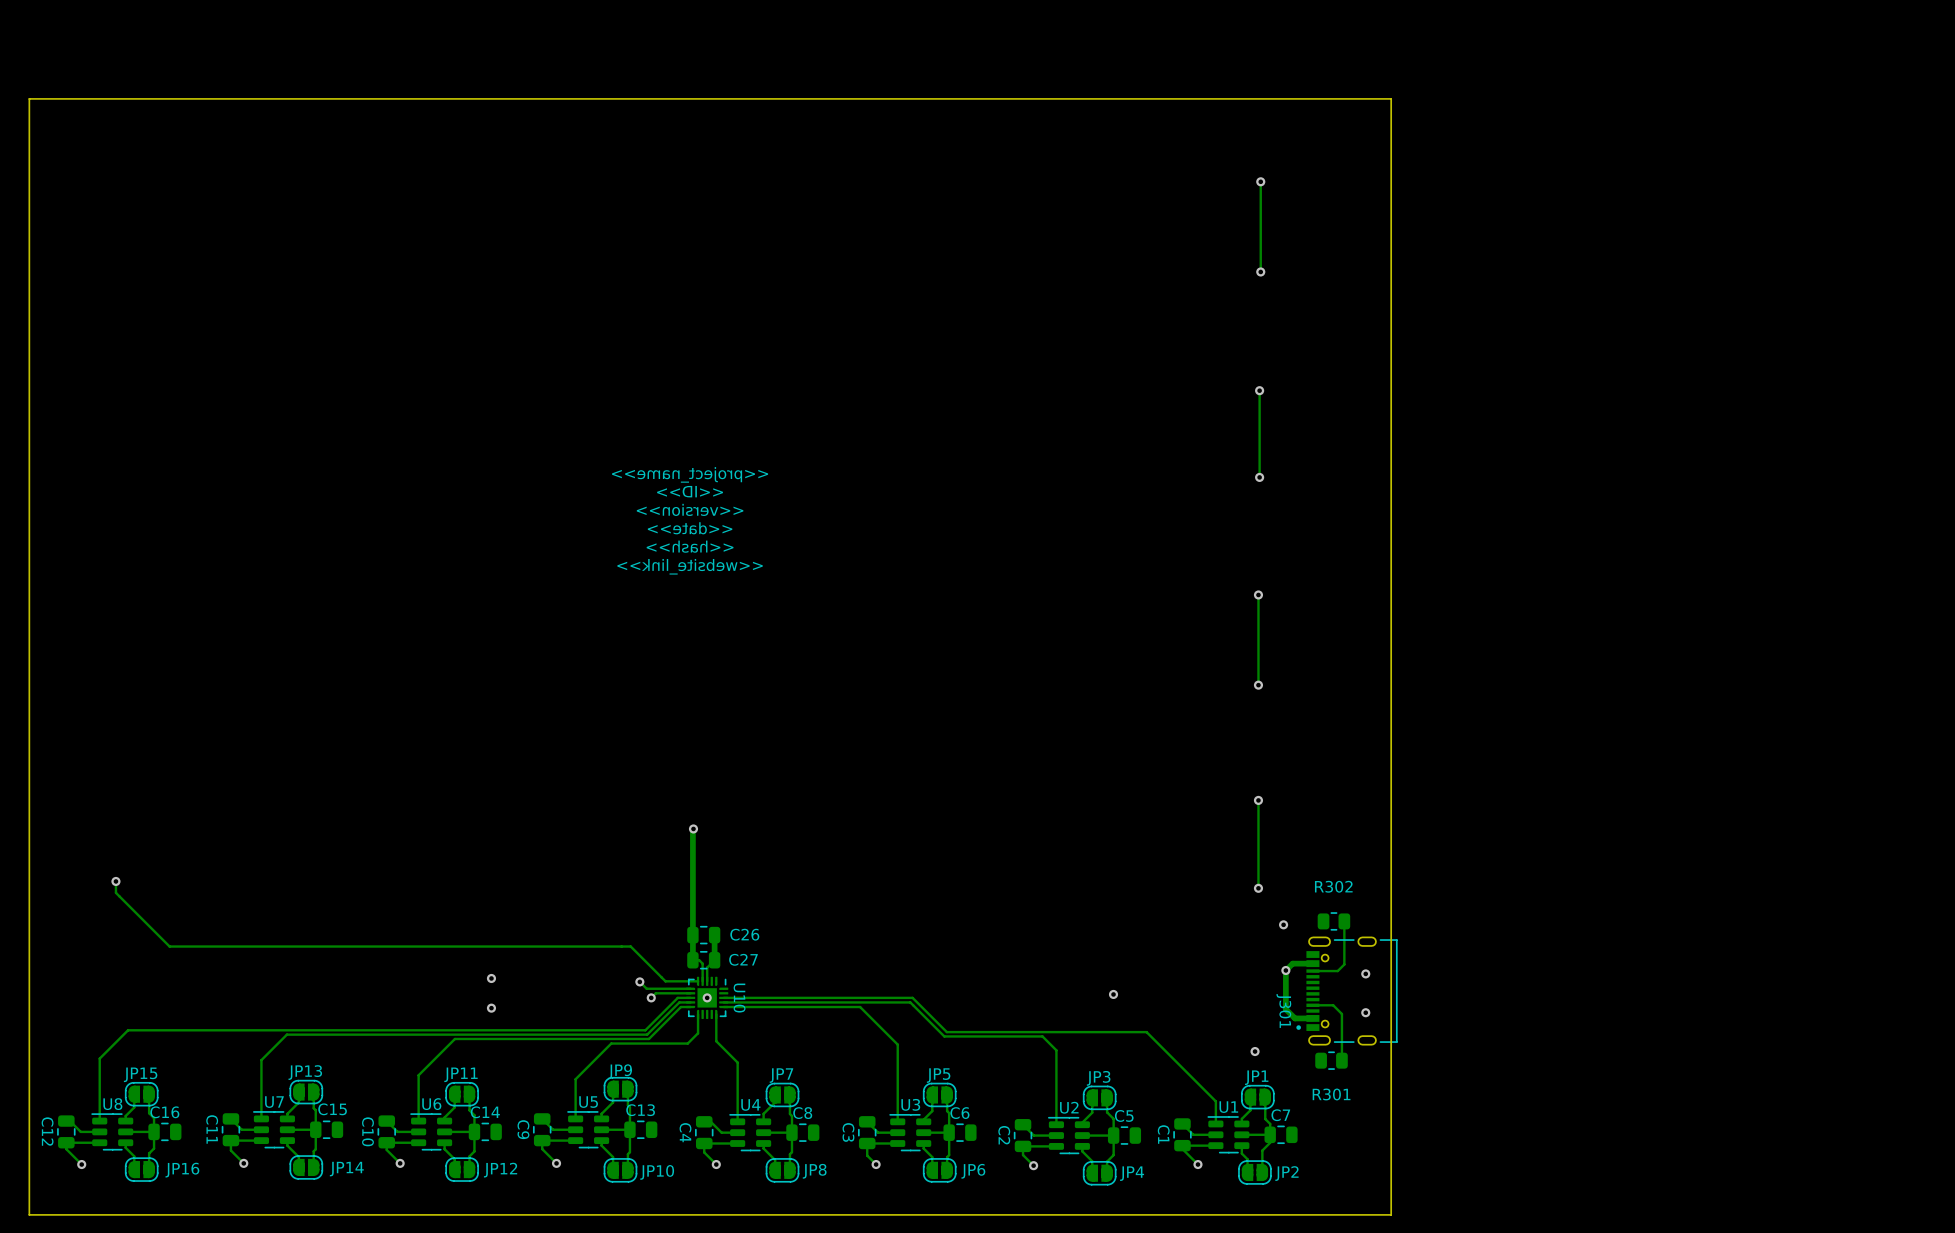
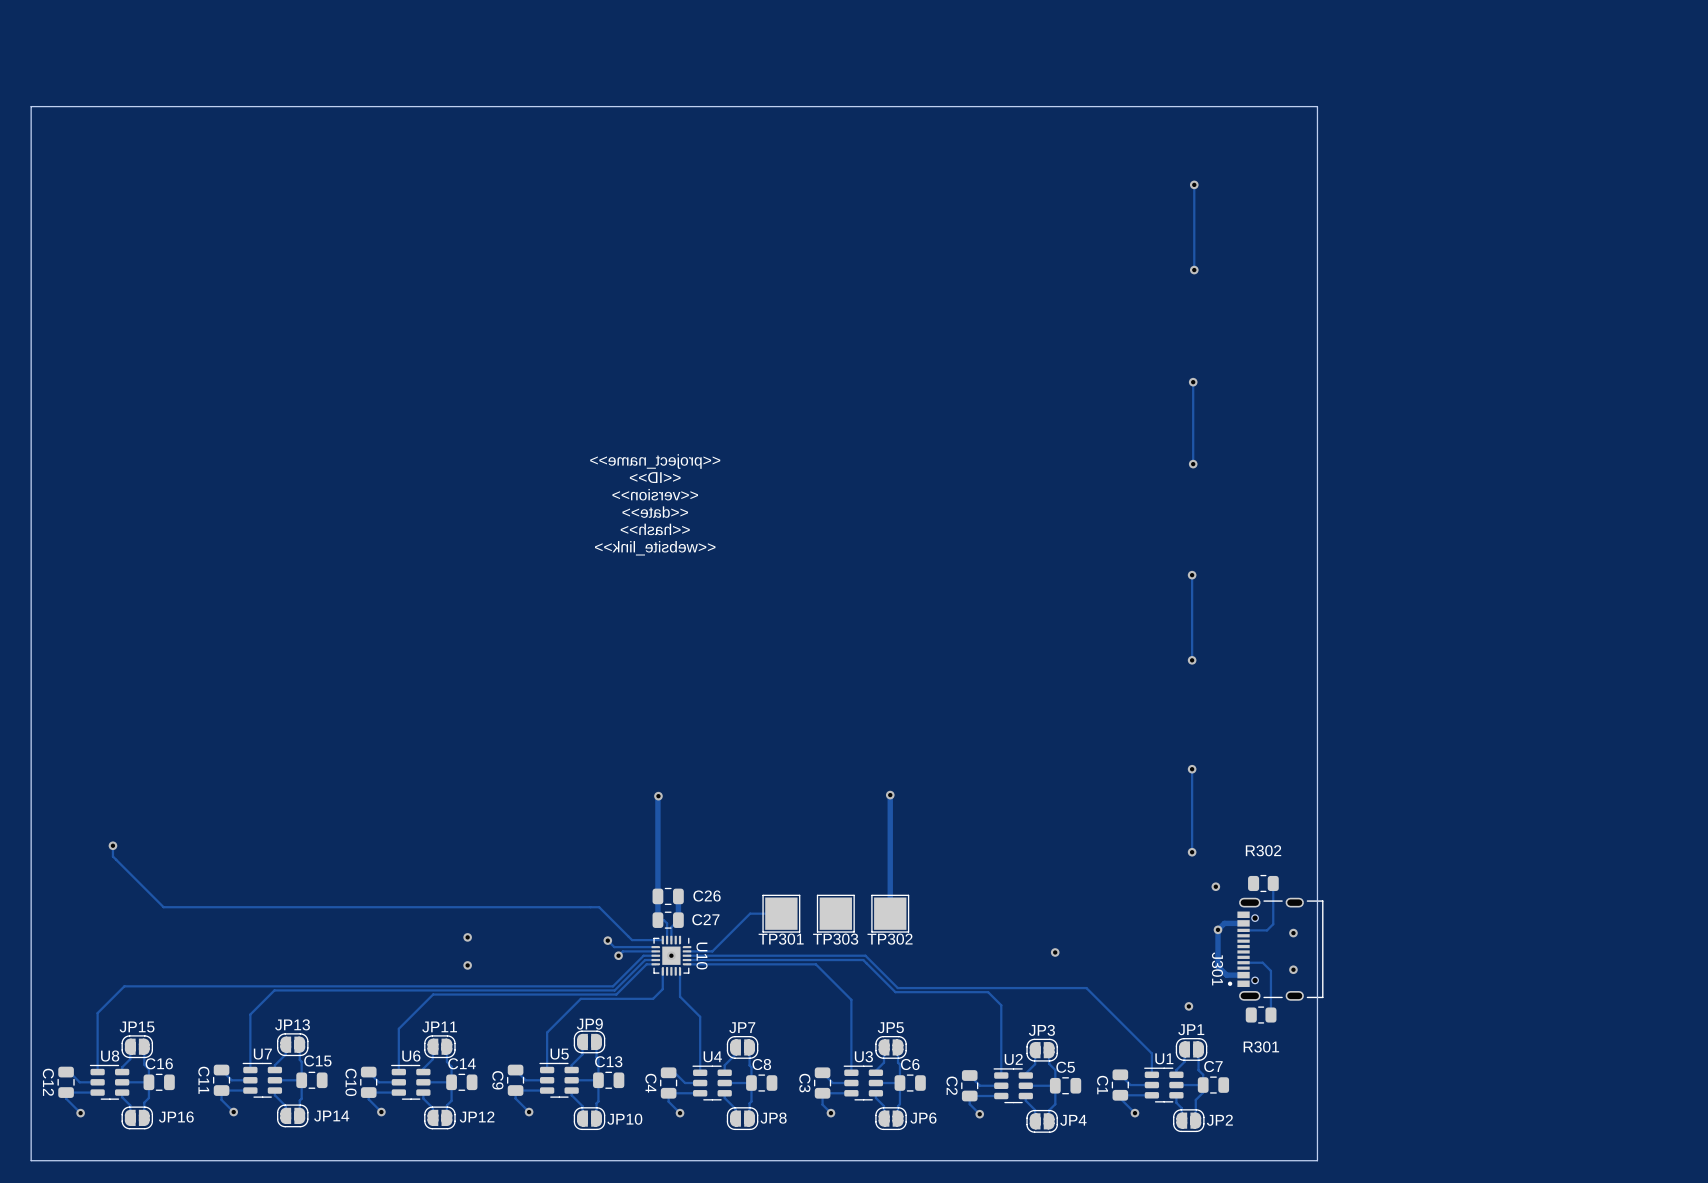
track: none -> (890, 795) (890, 913)
via: none -> (890, 795)
track: none -> (781, 913) (750, 913) (712, 951) (687, 951)
TP301: none -> (781, 913)
TP303: none -> (835, 913)
TP302: none -> (890, 913)

